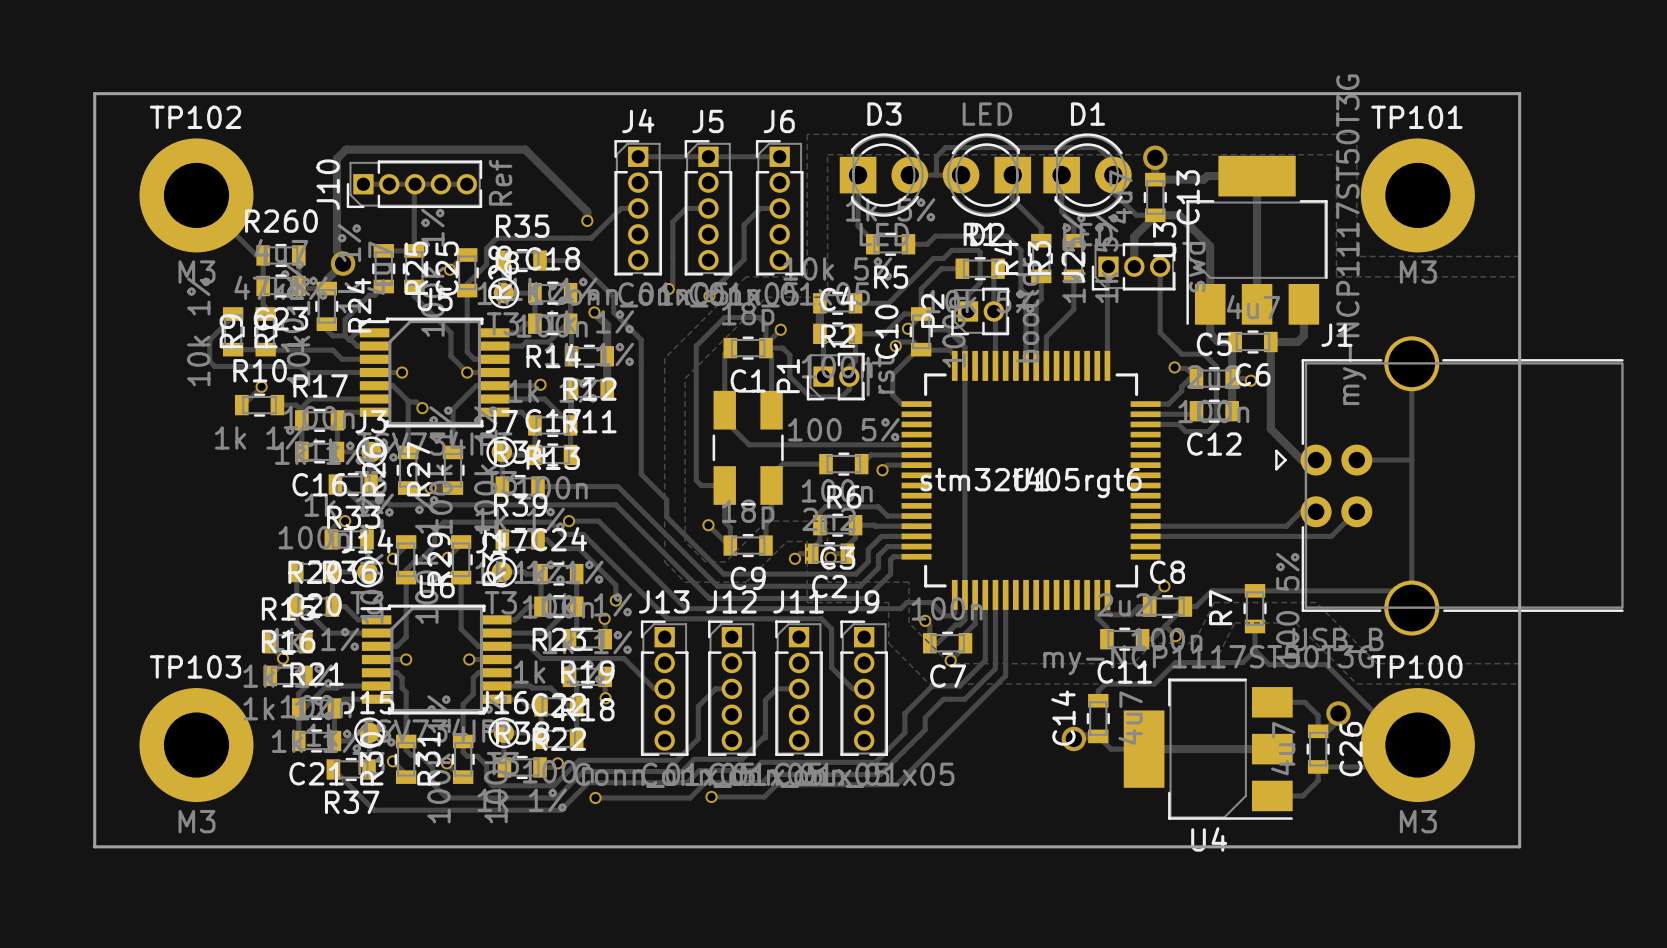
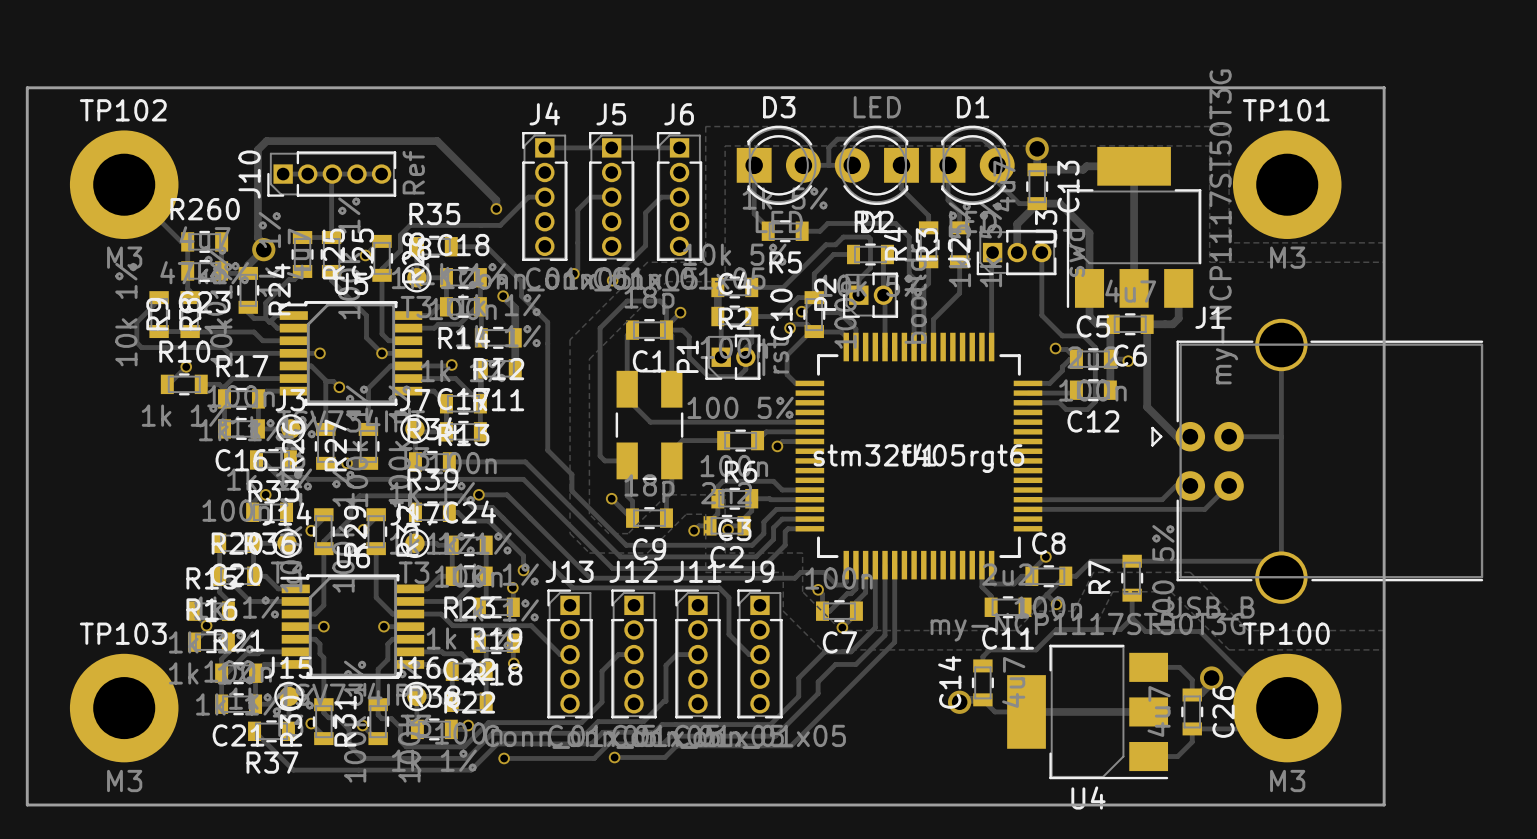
track: (964, 365) (964, 594) -> none

